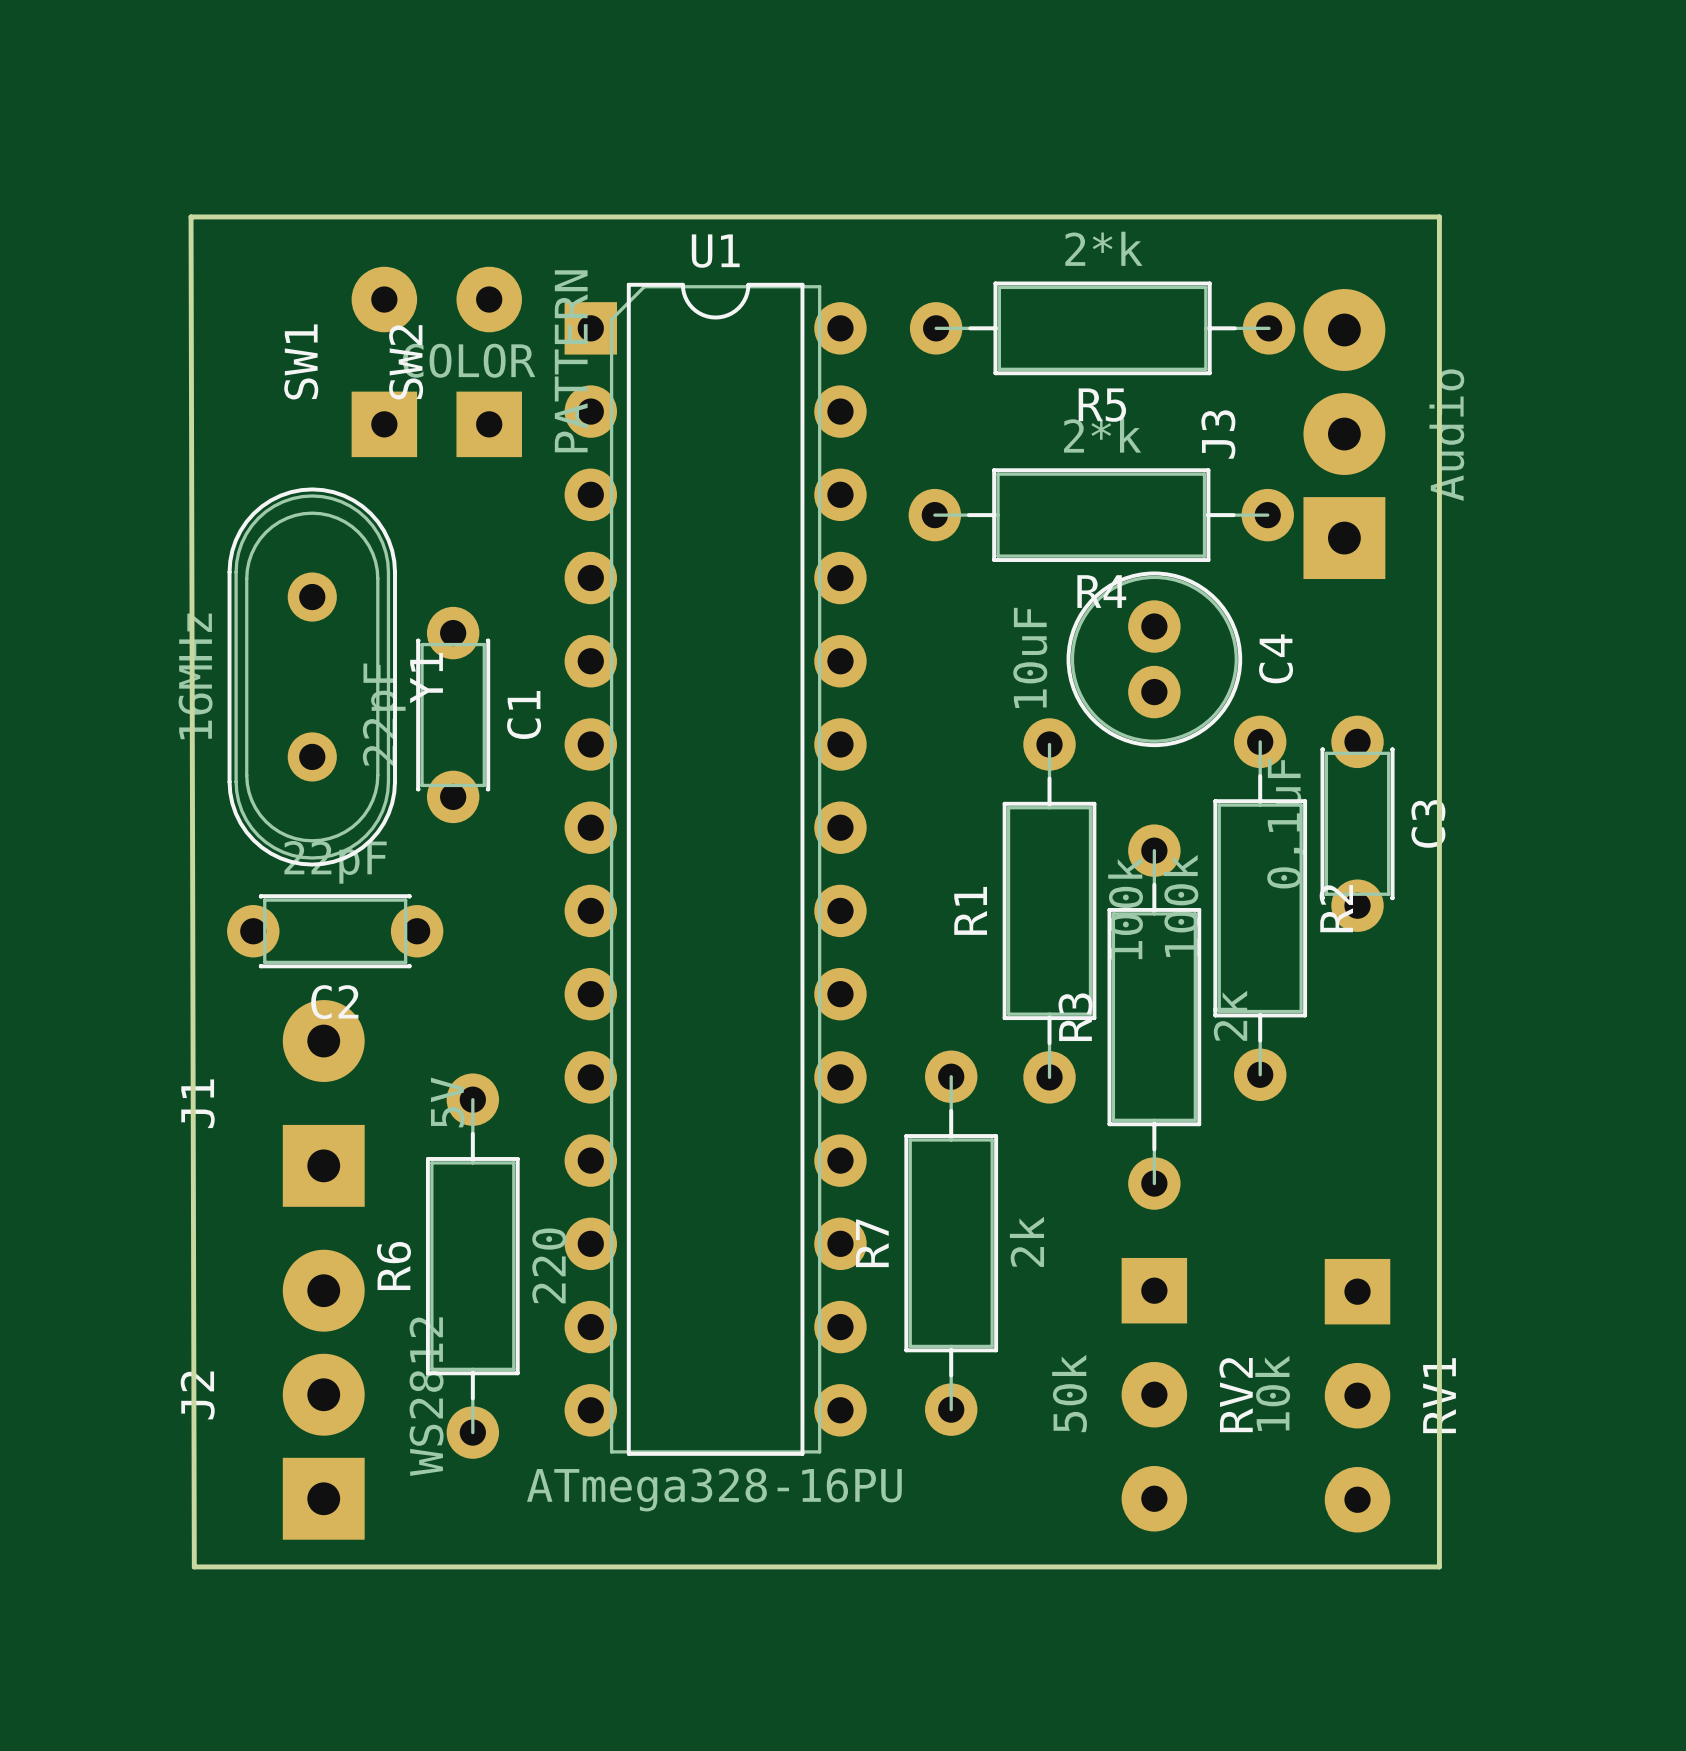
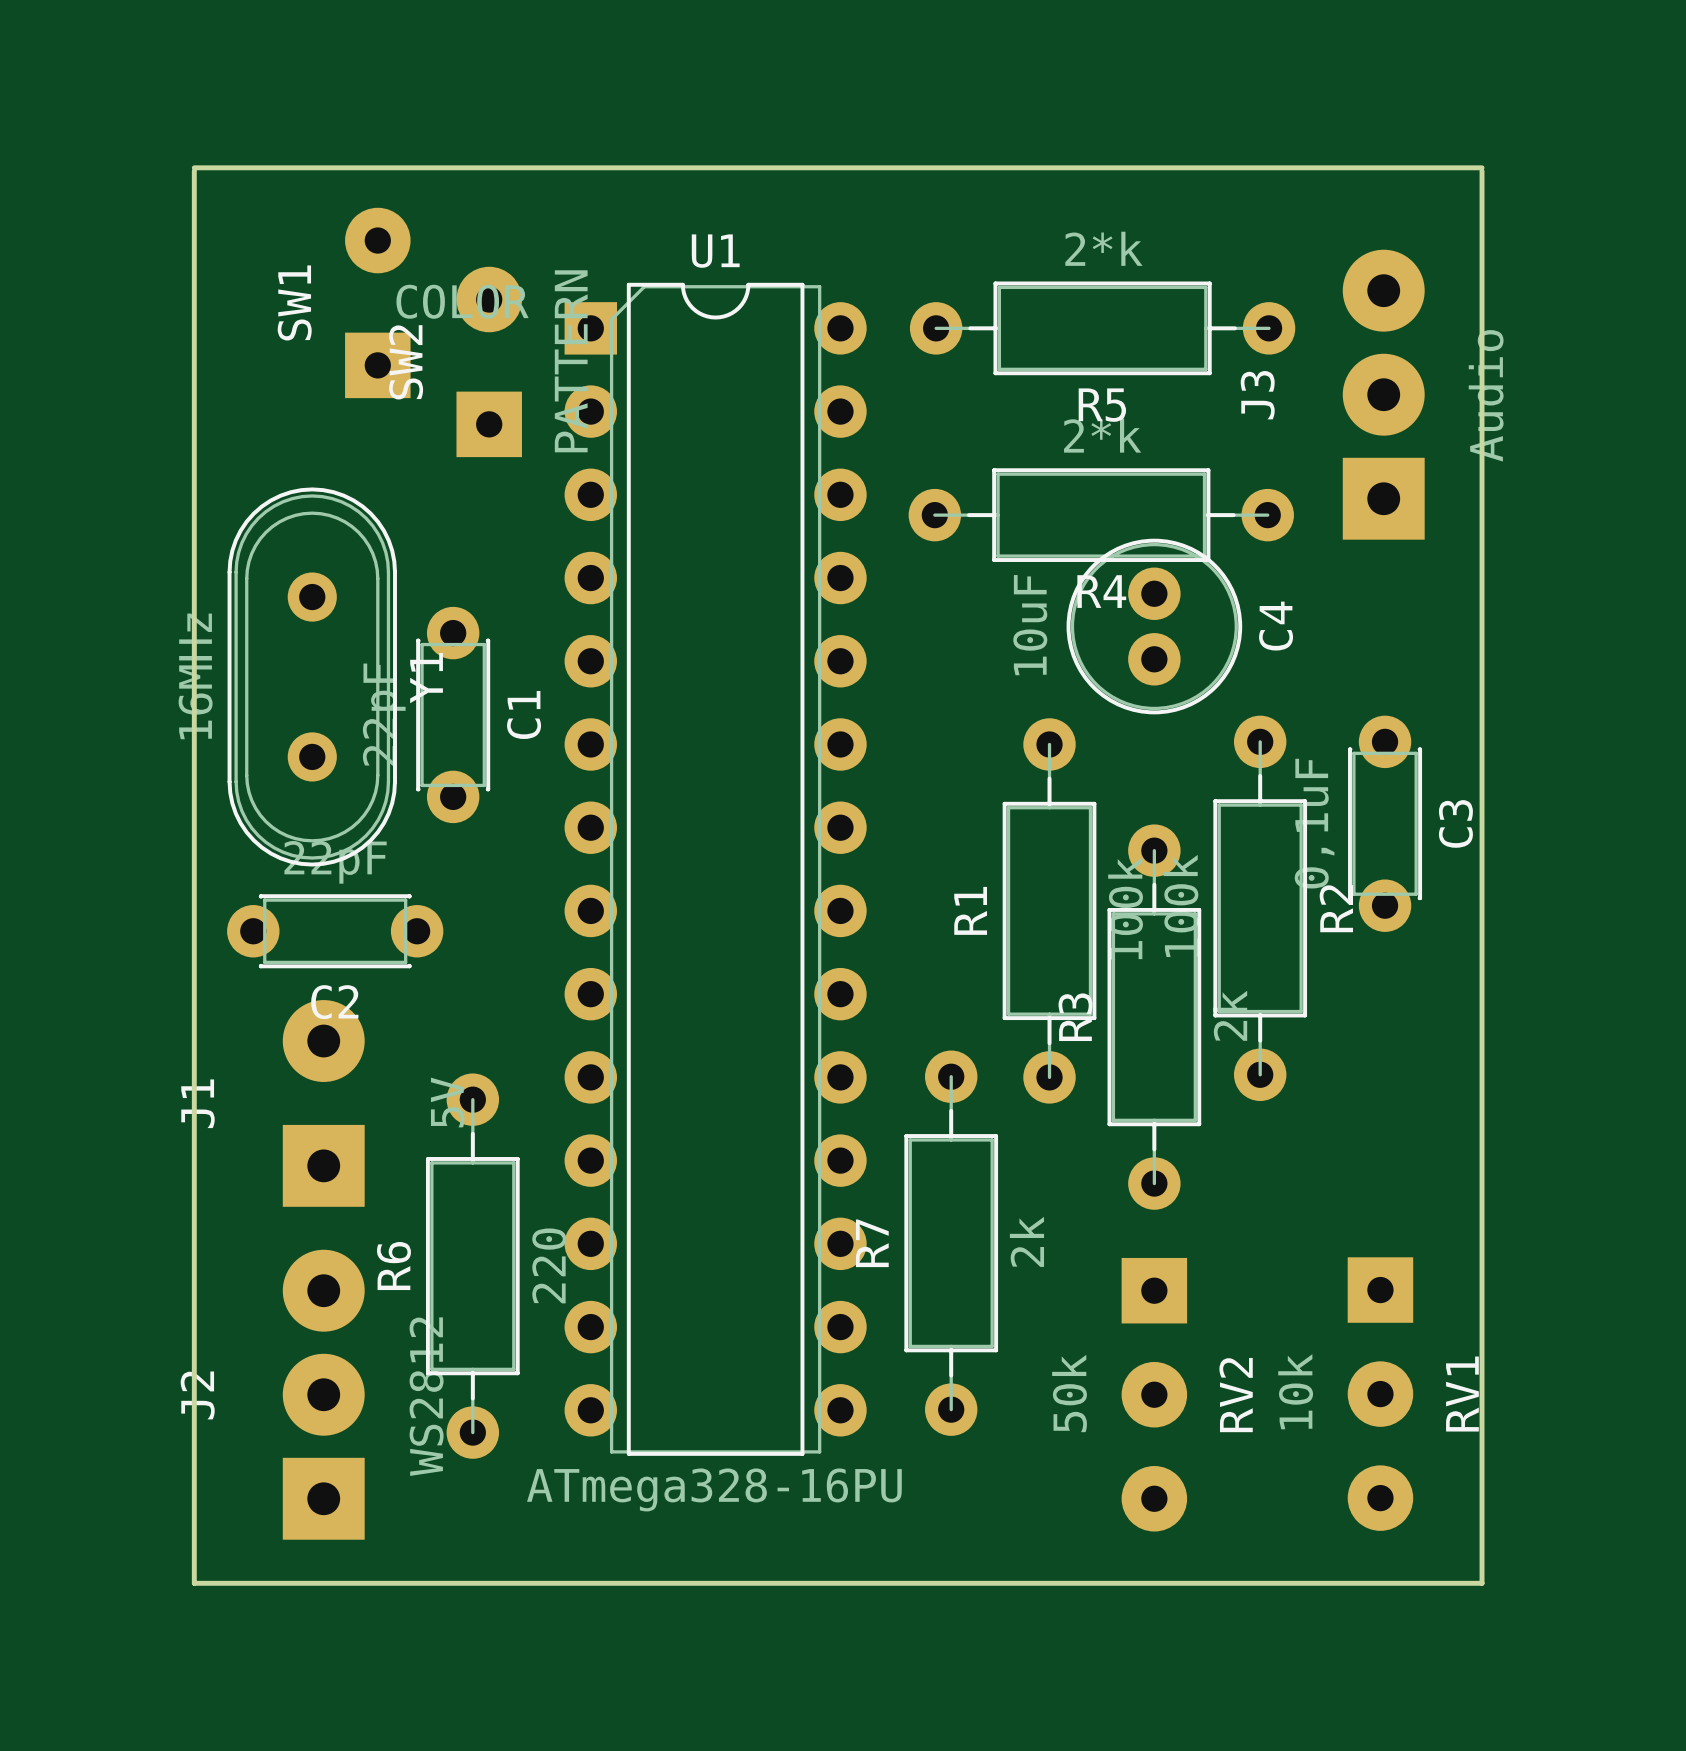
board edge: none -> (194, 167) (1482, 167)
board edge: none -> (194, 171) (194, 1583) (1482, 1583) (1482, 171)
board edge: (191, 216) (194, 1566) (1439, 1566) (1439, 216) (191, 216) -> none
SW1 position: (384, 361) -> (377, 302)
J3 position: (1344, 434) -> (1383, 394)
C4 position: (1154, 659) -> (1154, 626)
C3 position: (1357, 823) -> (1385, 823)
RV1 position: (1357, 1395) -> (1380, 1394)

